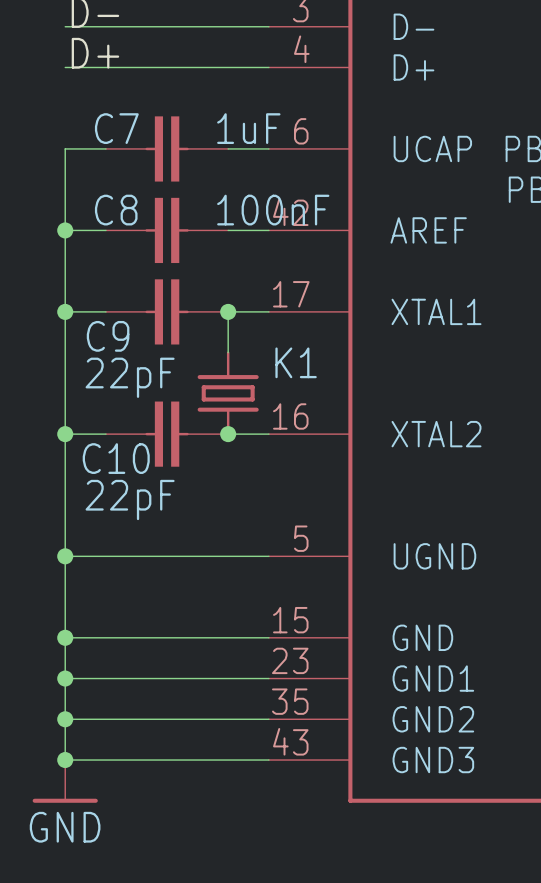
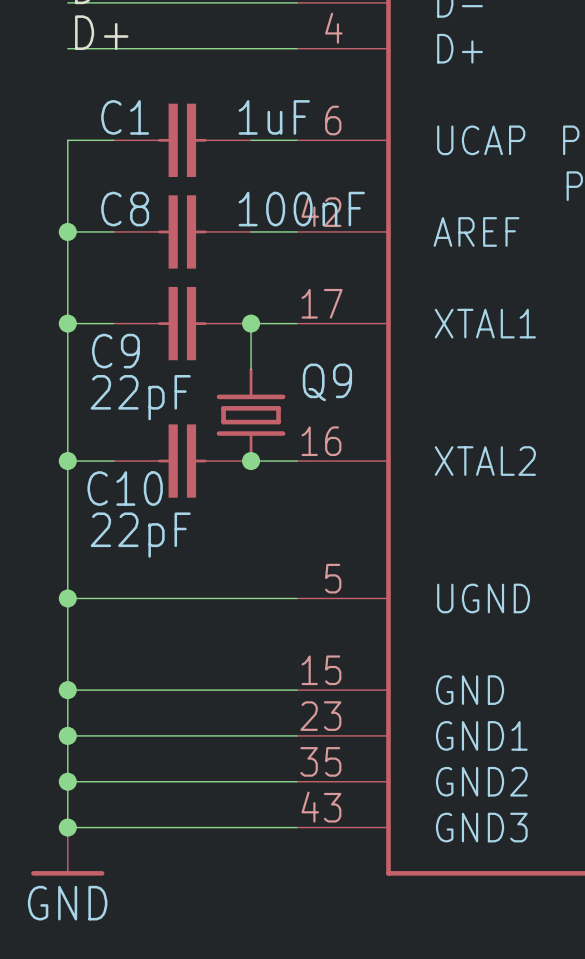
C7 name: C7 (116, 128) -> C1 (125, 117)
K1 name: K1 (296, 362) -> Q9 (327, 382)

